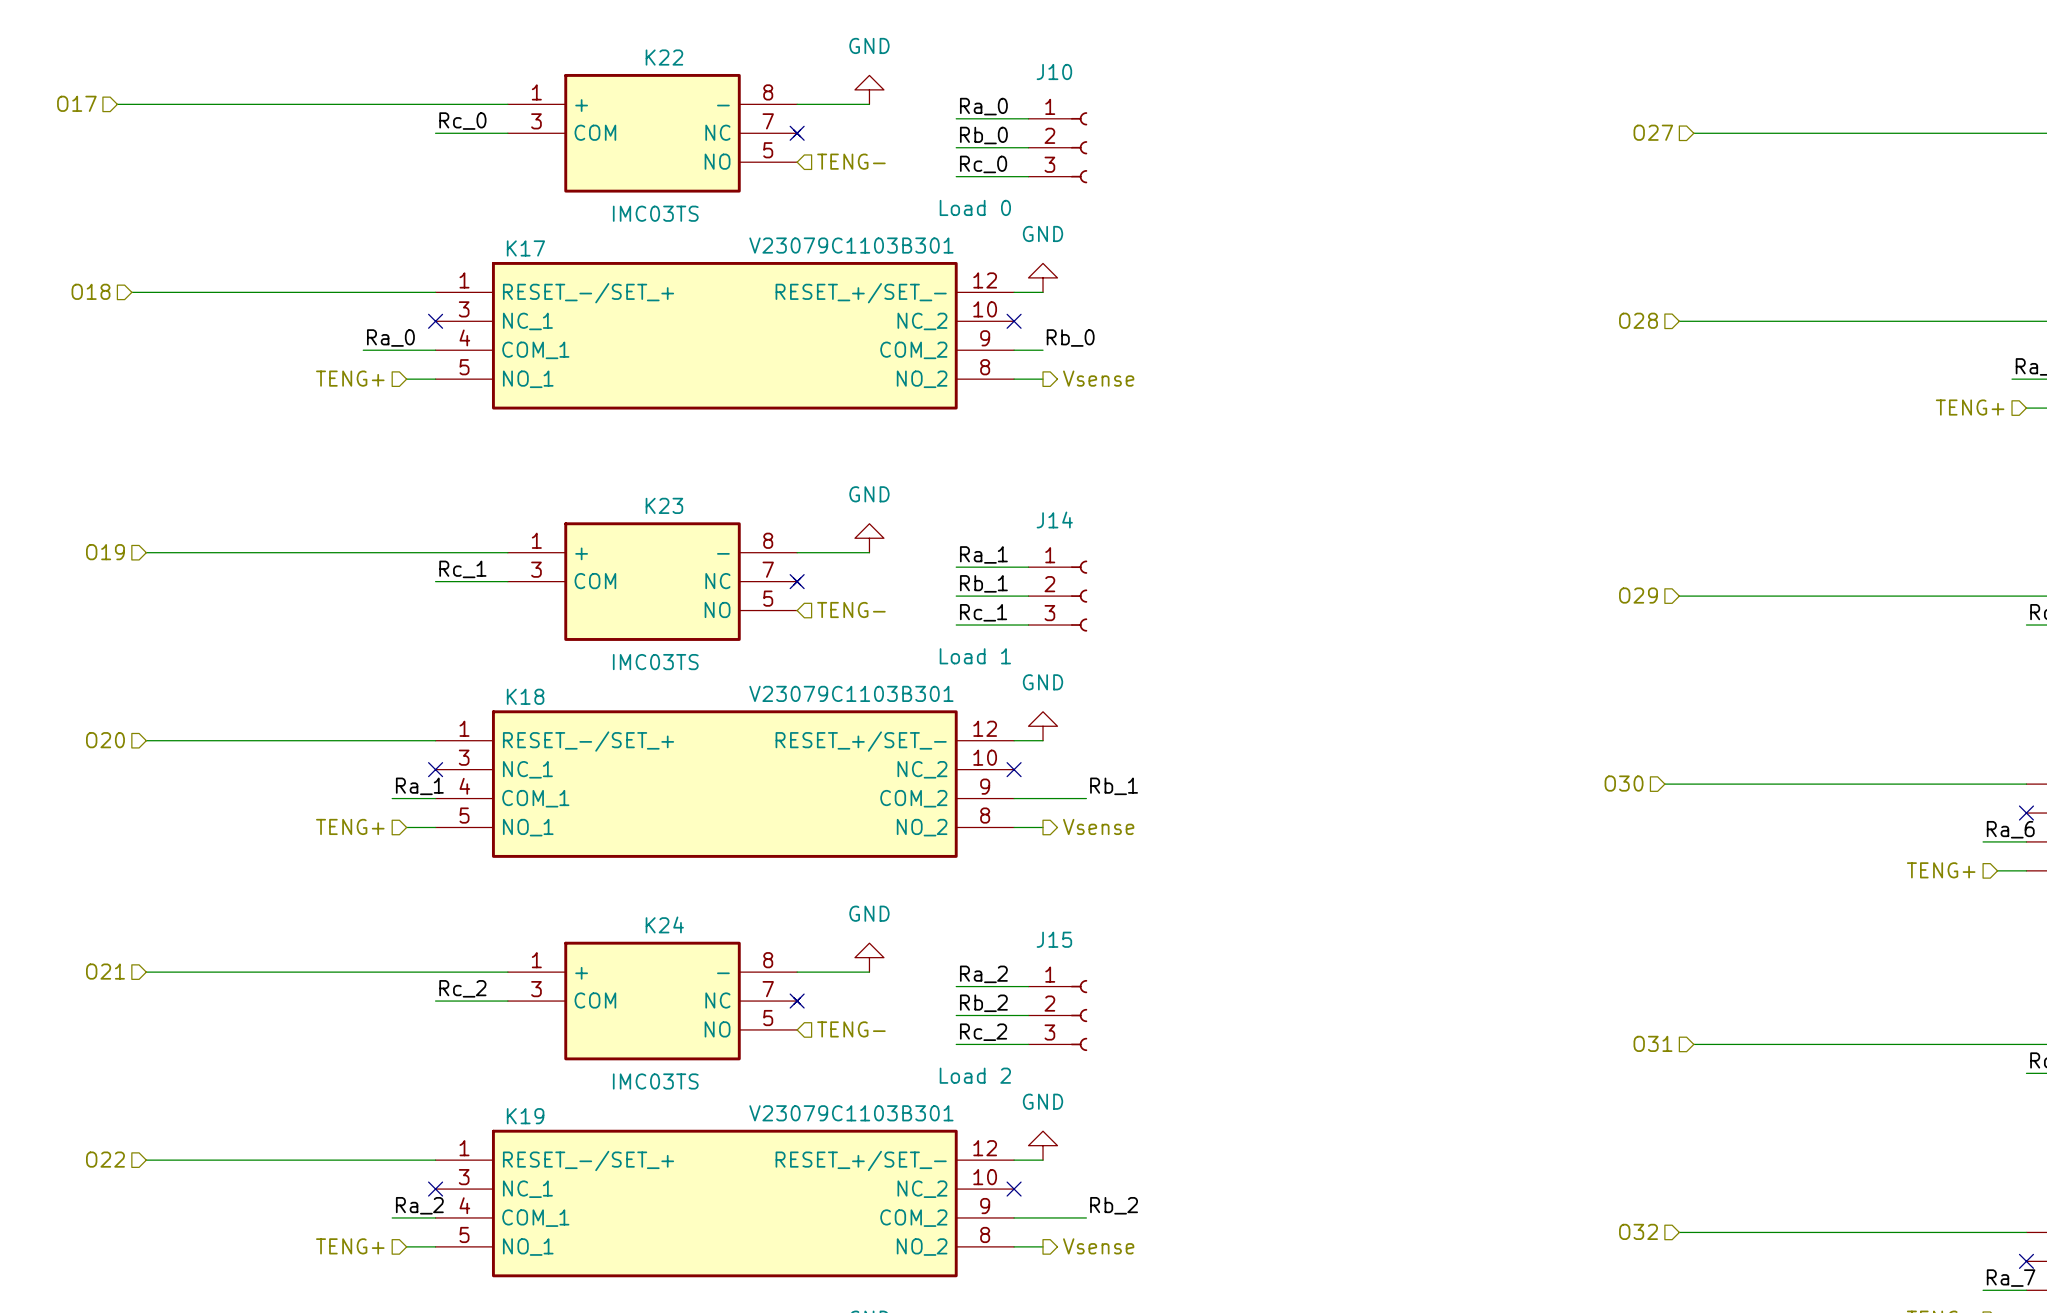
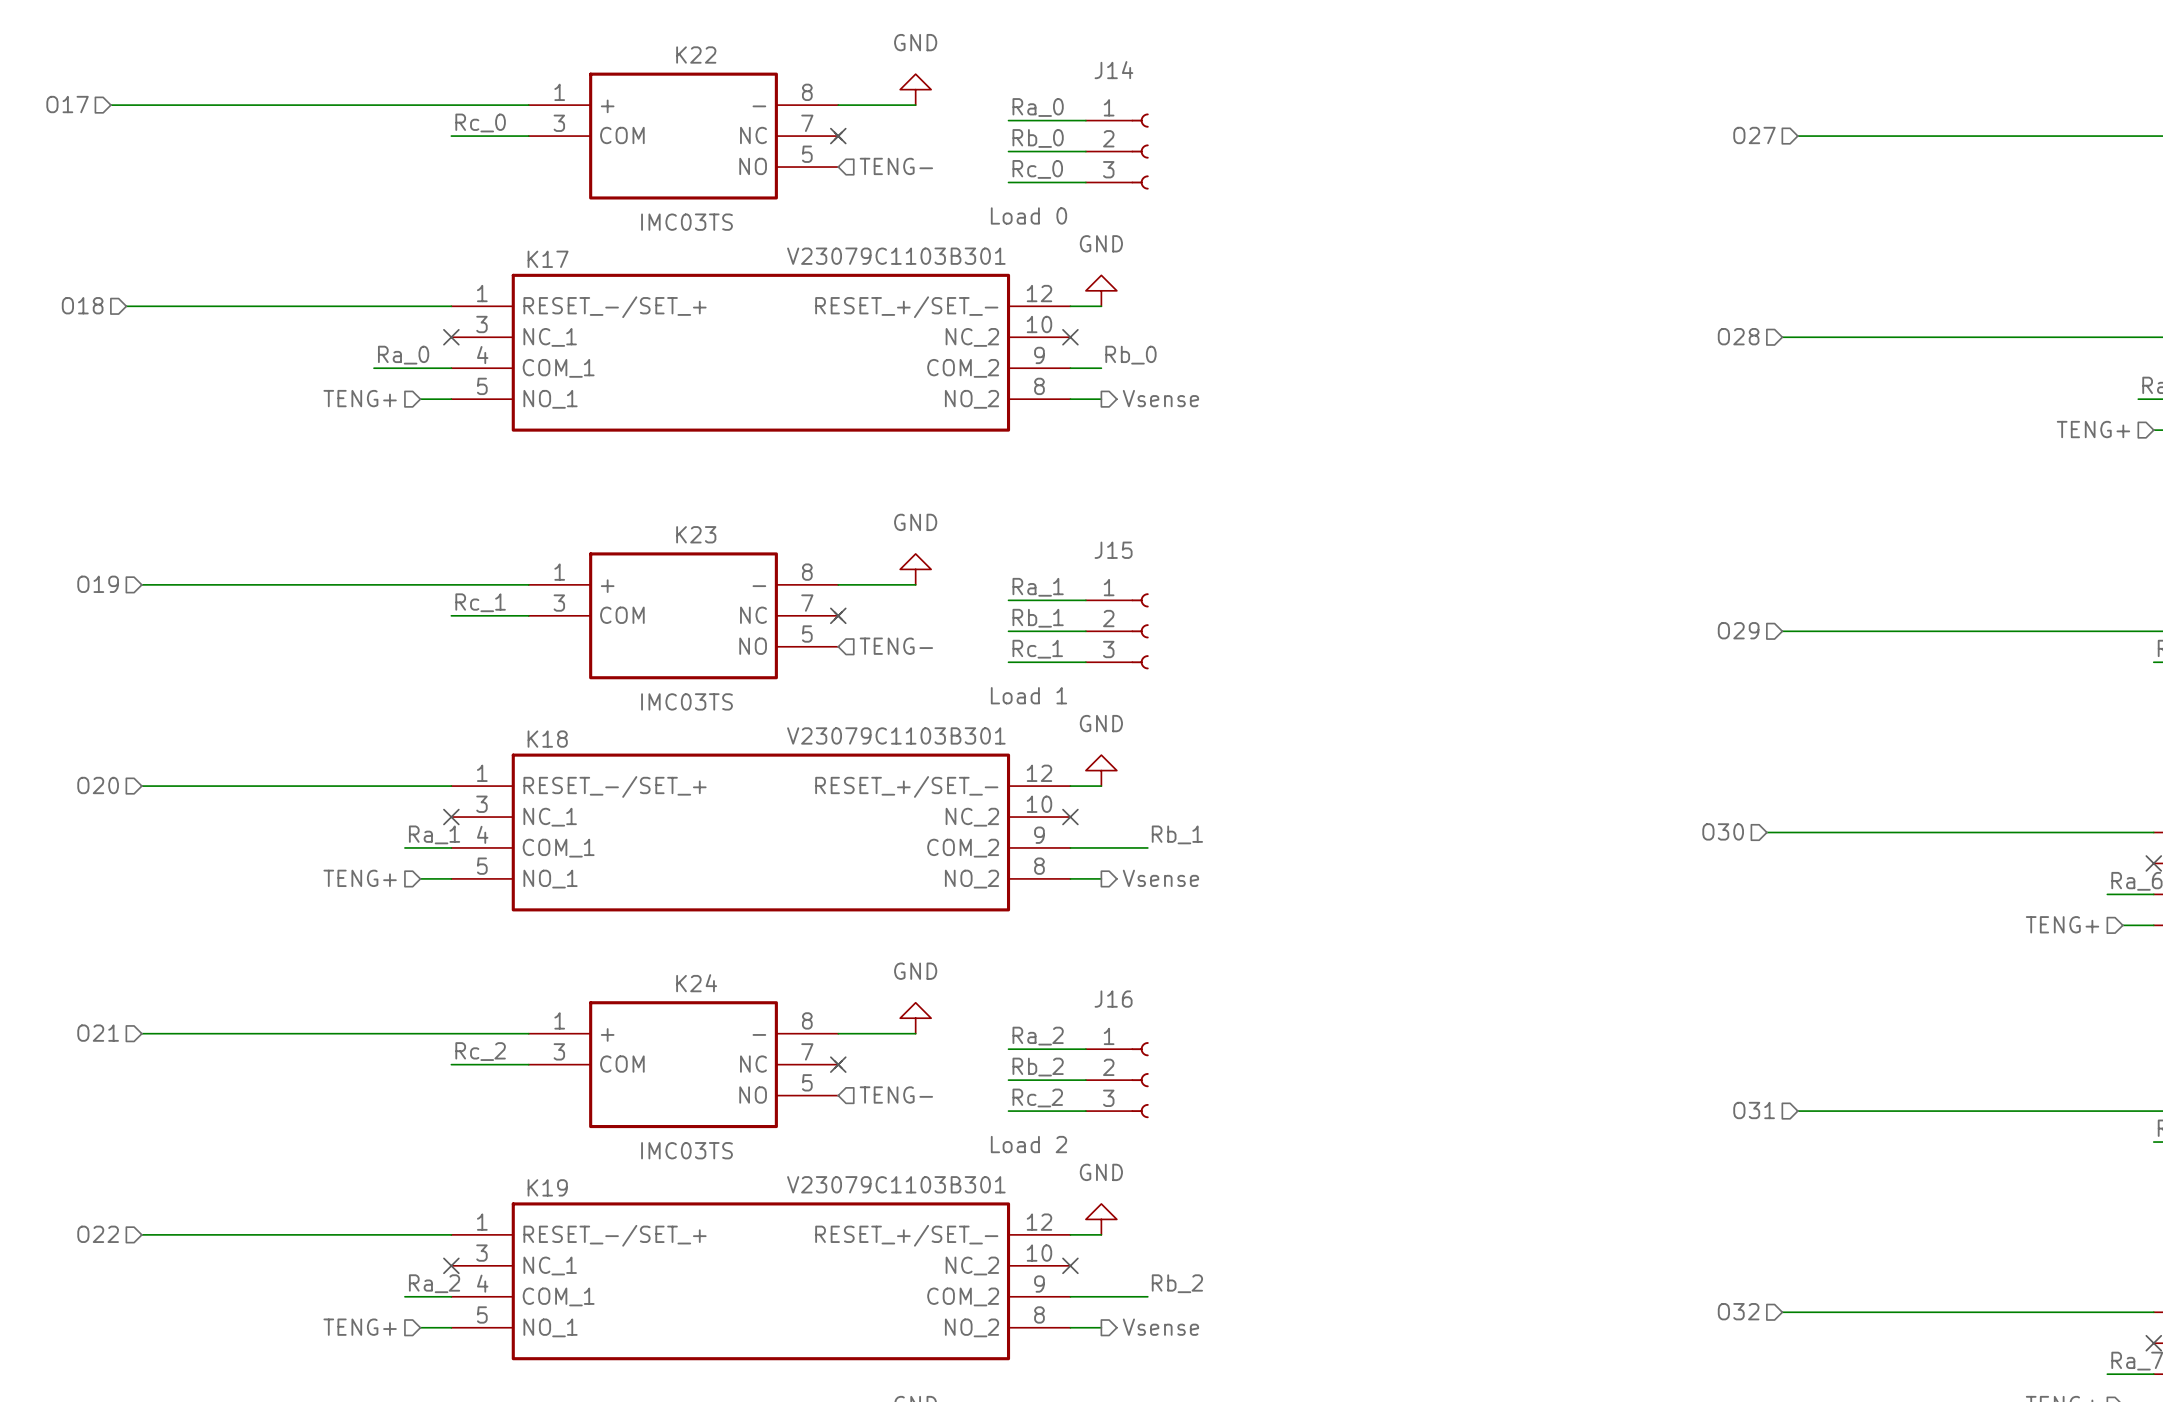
J10 name: J10 (1054, 71) -> J14 (1113, 70)
J14 name: J14 (1054, 519) -> J15 (1113, 550)
J15 name: J15 (1054, 939) -> J16 (1113, 999)

